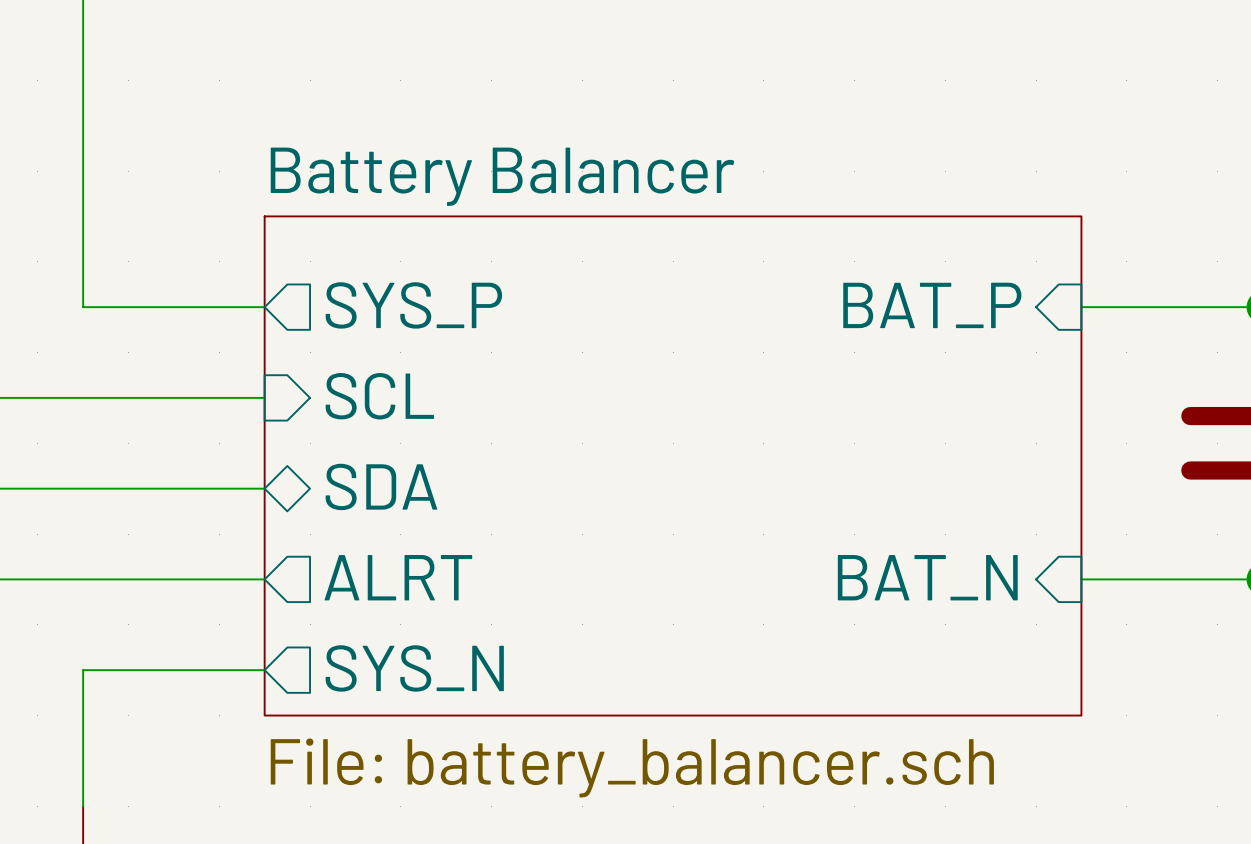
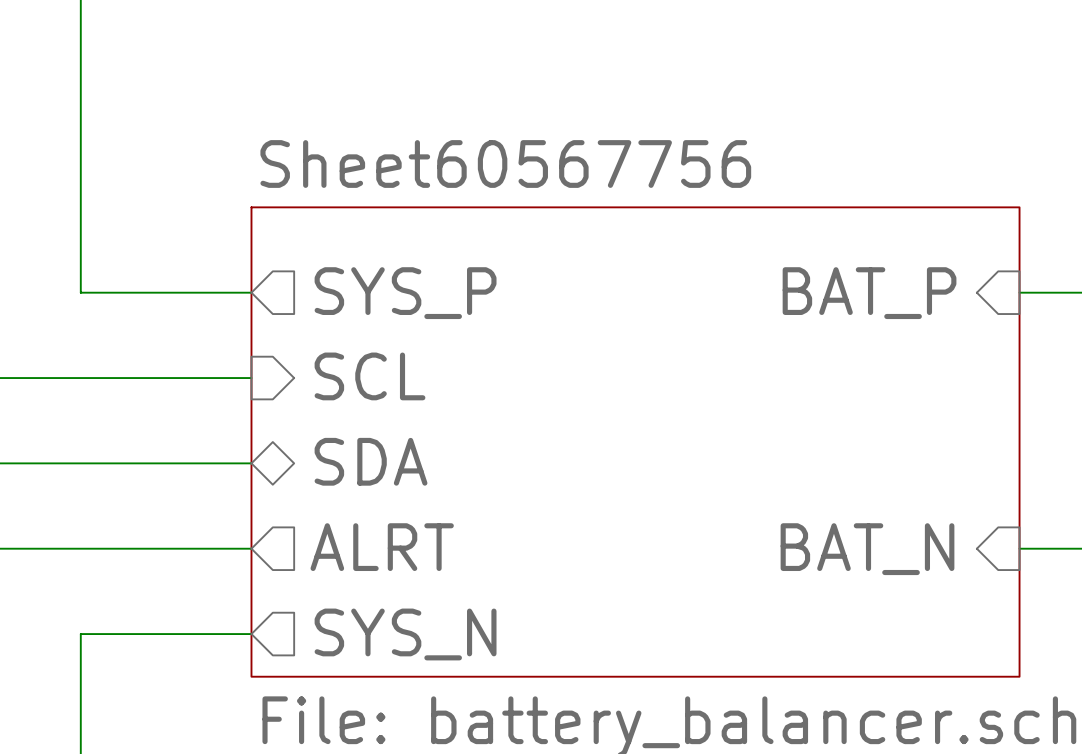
sheet Battery Balancer name: Battery Balancer (502, 176) -> Sheet60567756 (505, 163)

